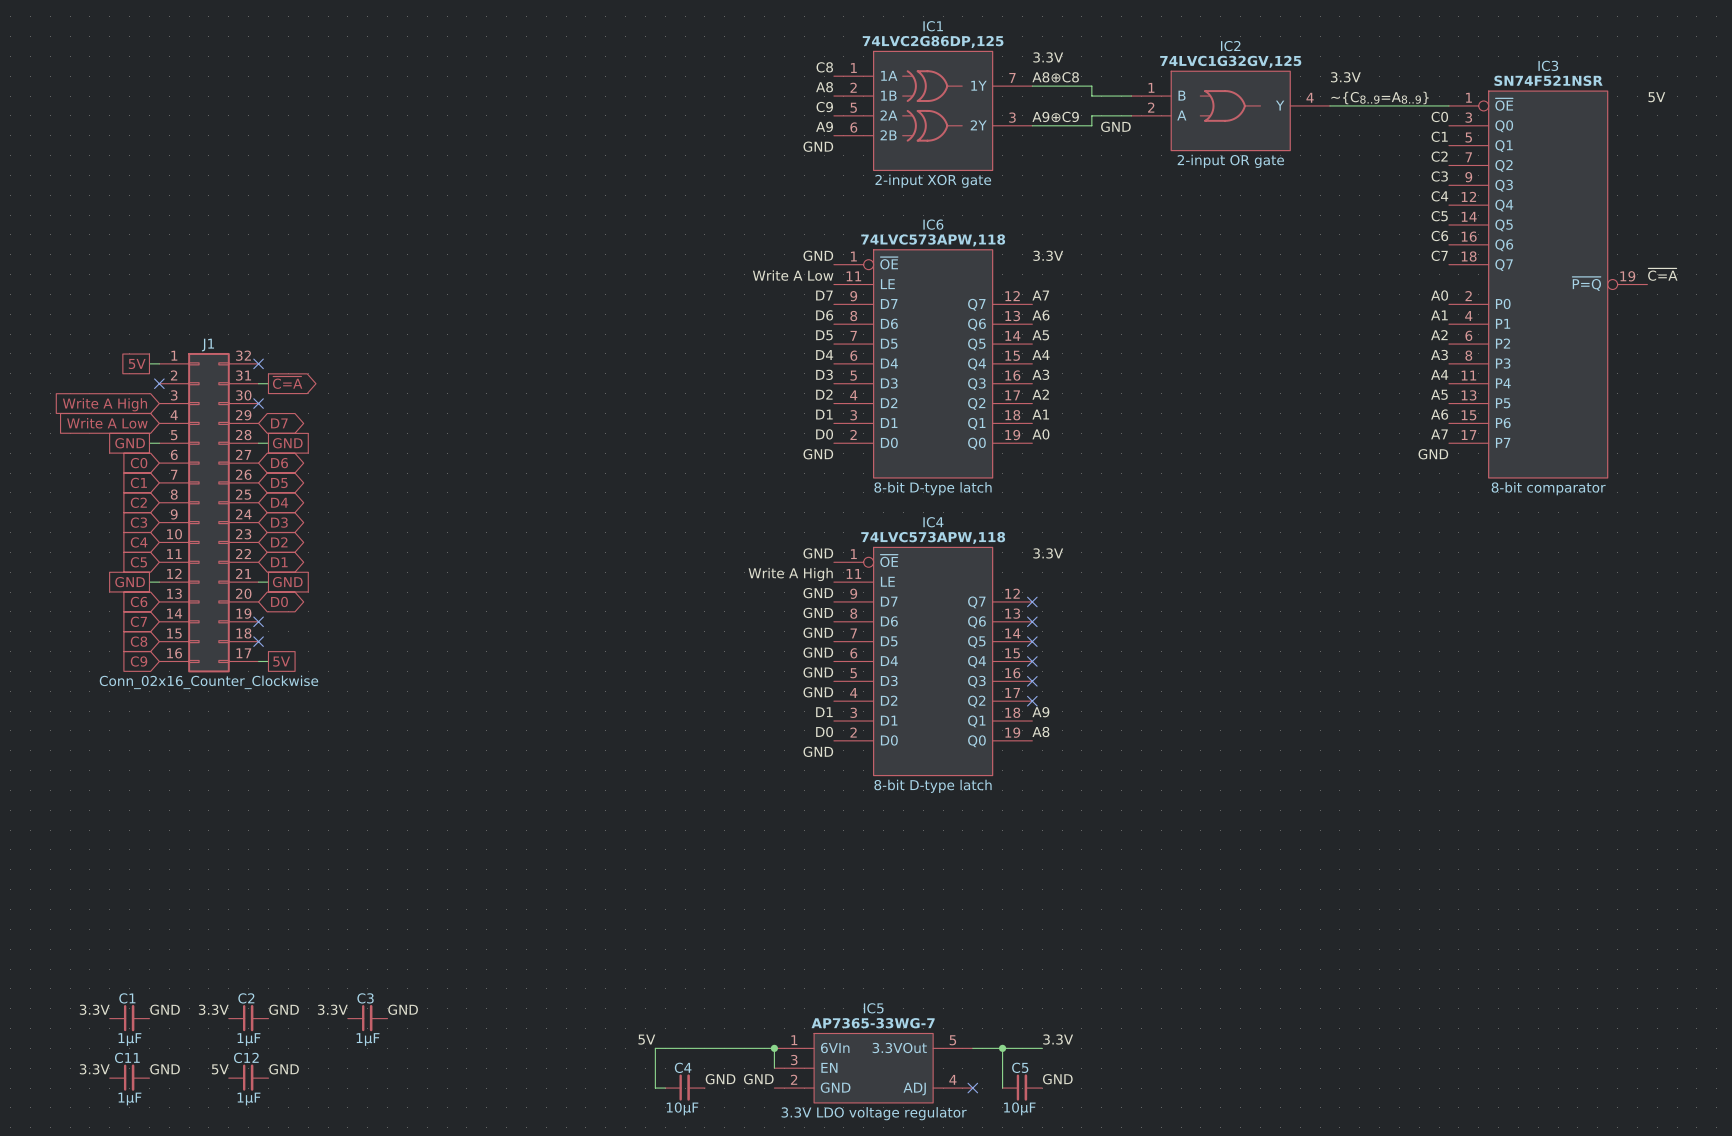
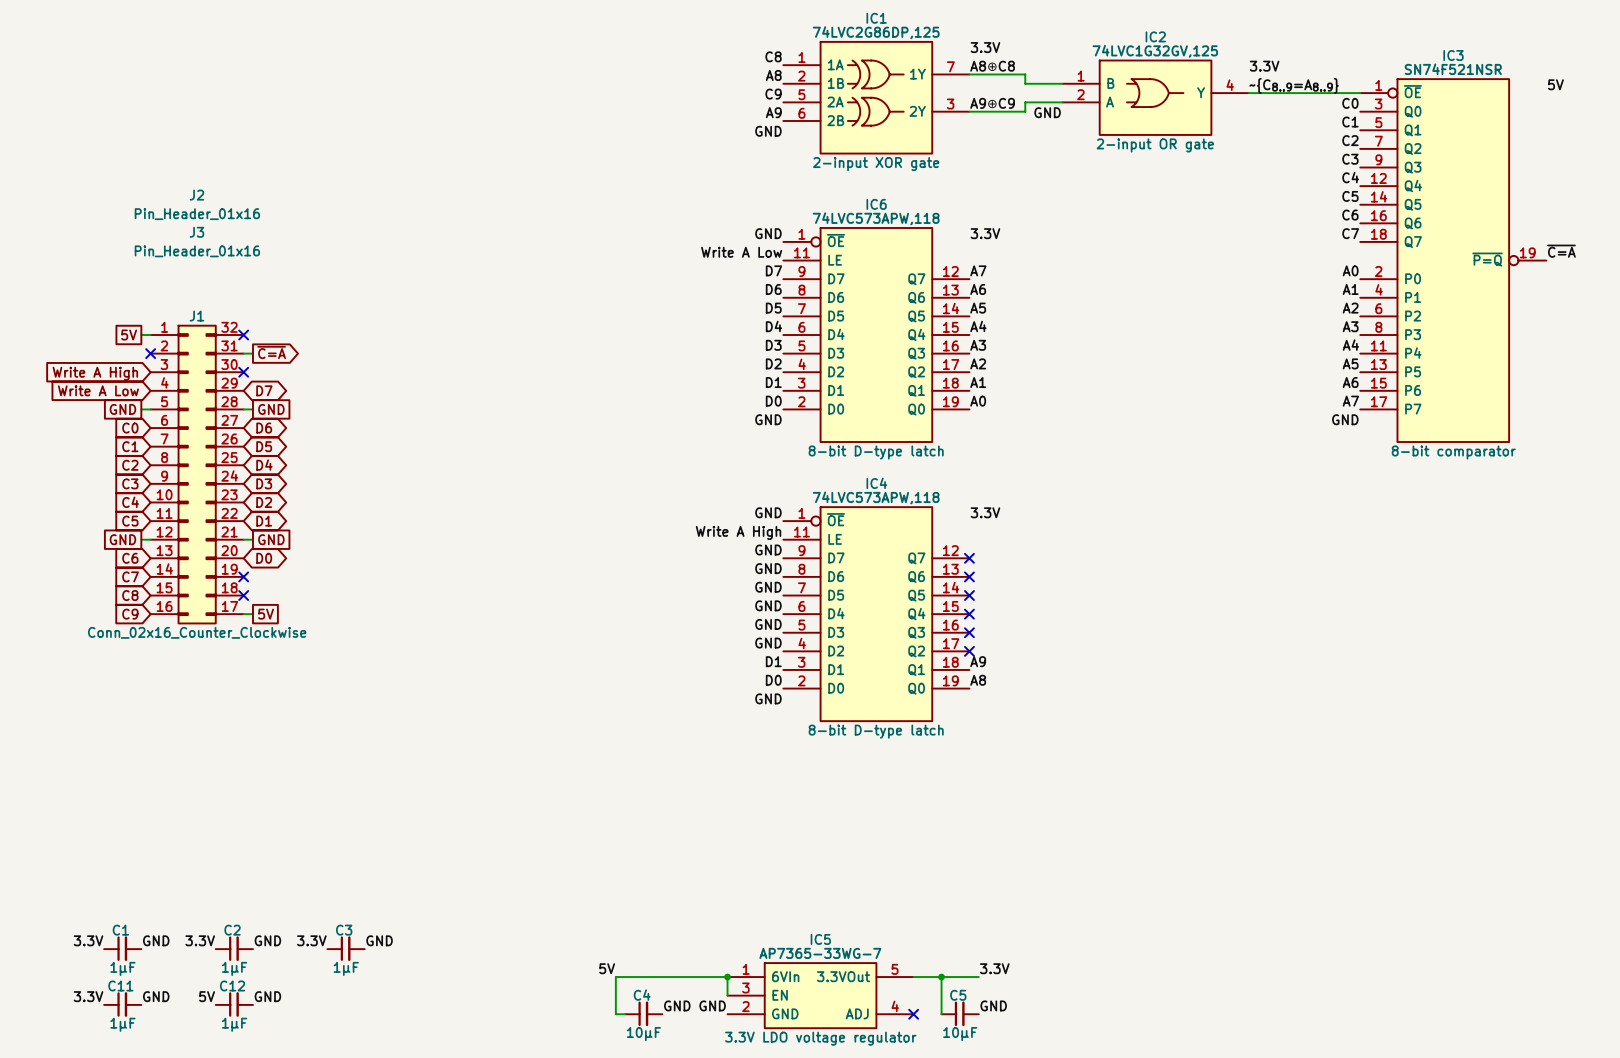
J2: none -> Pin_Header_01x16 (197, 204)
J3: none -> Pin_Header_01x16 (197, 242)

